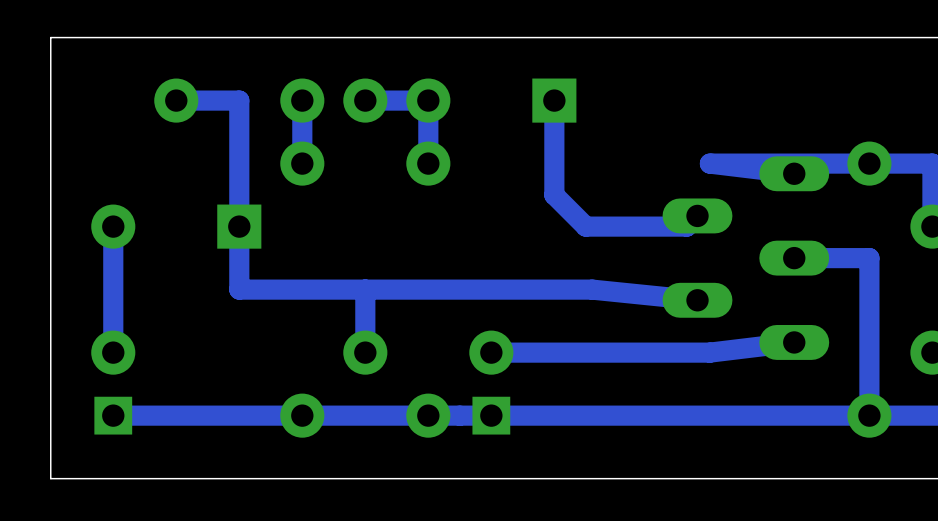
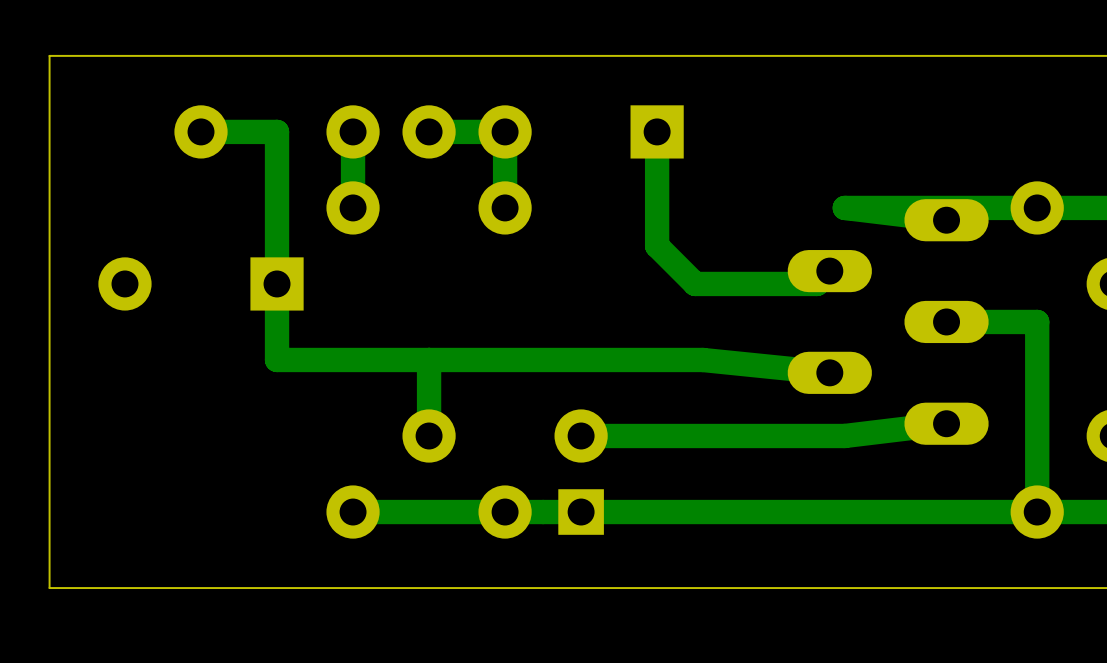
bottom track: (113, 226) (113, 352) -> none
part: (113, 382) -> none
bottom track: (302, 415) (113, 415) -> none

